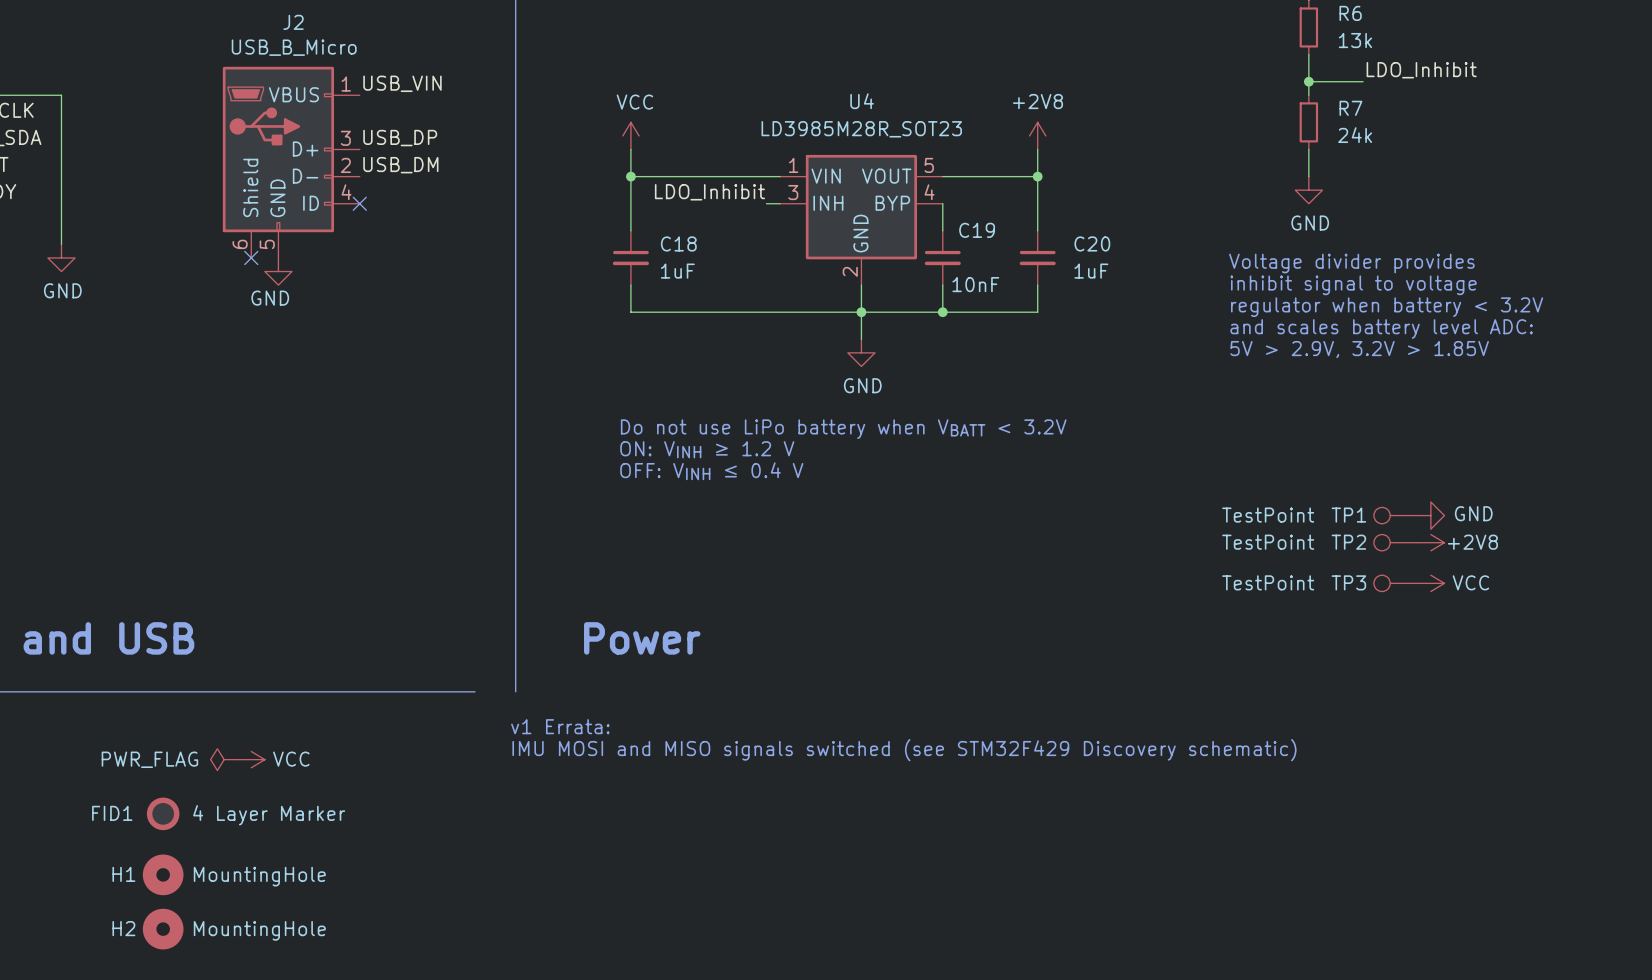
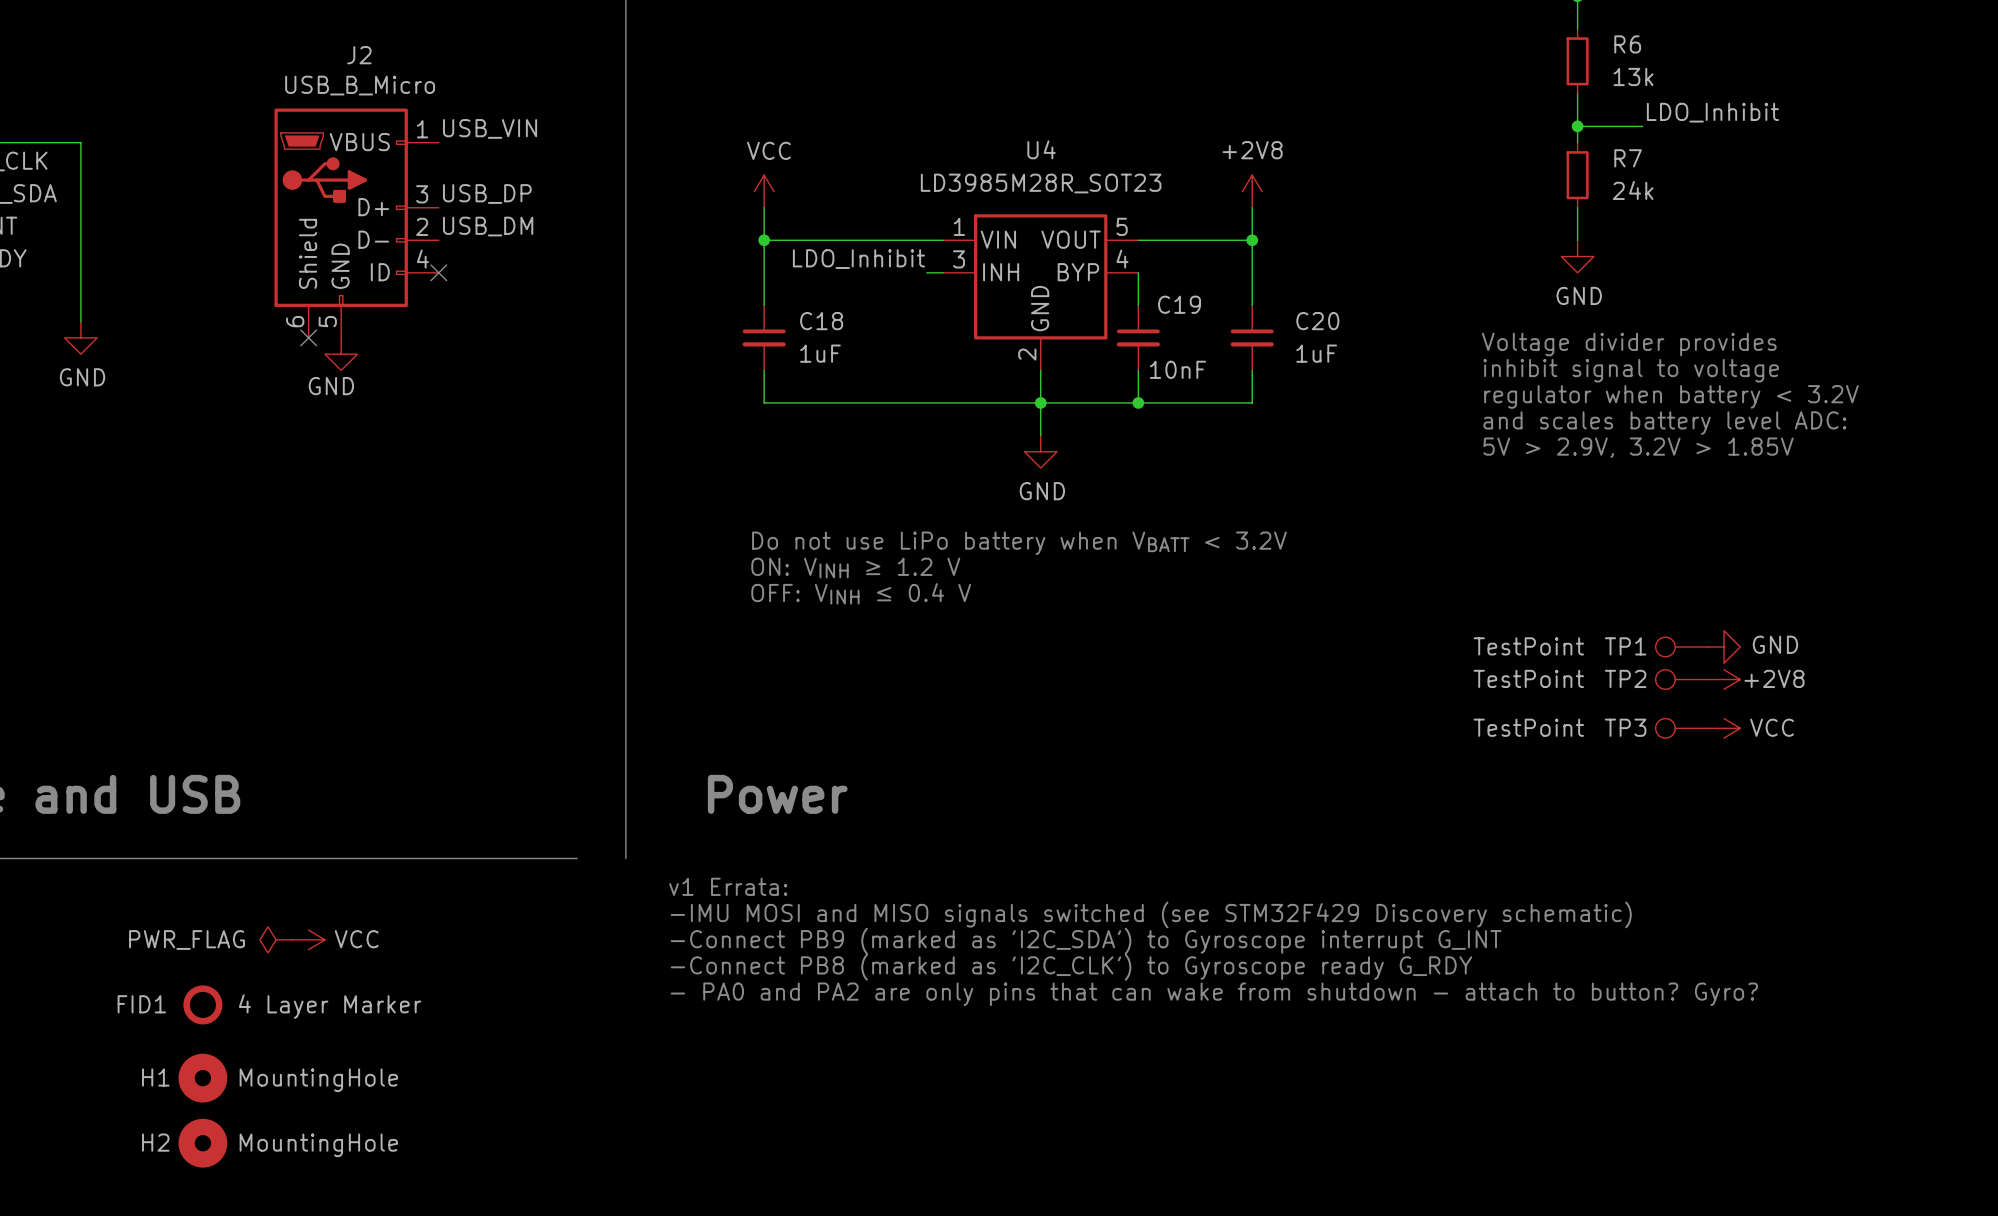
text position: v1 Errata: (560, 726) -> v1 Errata: (728, 886)
text: IMU MOSI and MISO signals switched (see STM32F429 Discovery schematic) (904, 750) -> -IMU MOSI and MISO signals switched (see STM32F429 Discovery schematic) (1151, 914)
text: none -> -Connect PB9 (marked as 'I2C_SDA') to Gyroscope interrupt G_INT (1086, 941)
text: none -> -Connect PB8 (marked as 'I2C_CLK') to Gyroscope ready G_RDY (1071, 967)
text: none -> - PA0 and PA2 are only pins that can wake from shutdown - attach to button? Gyro? (1214, 994)

